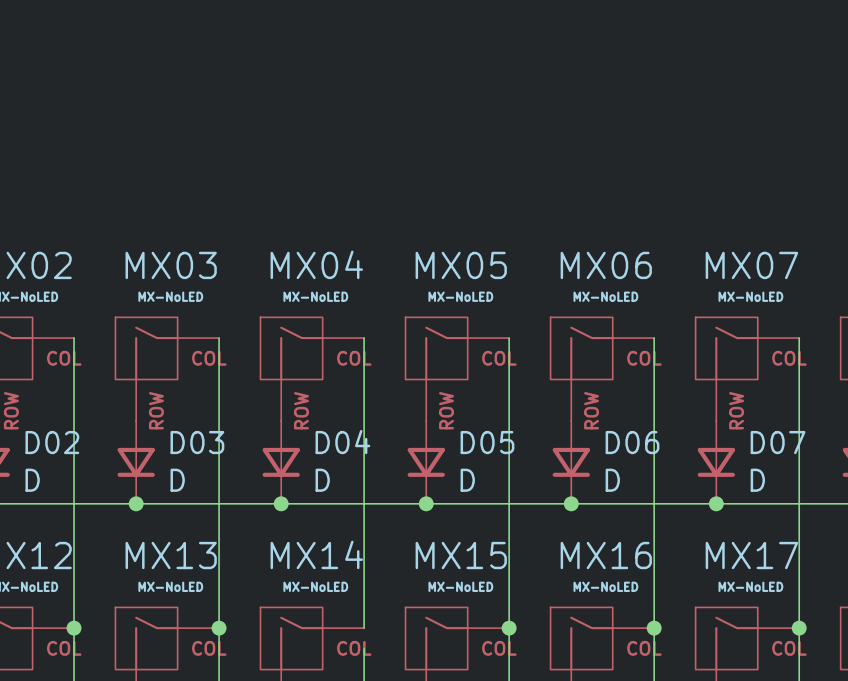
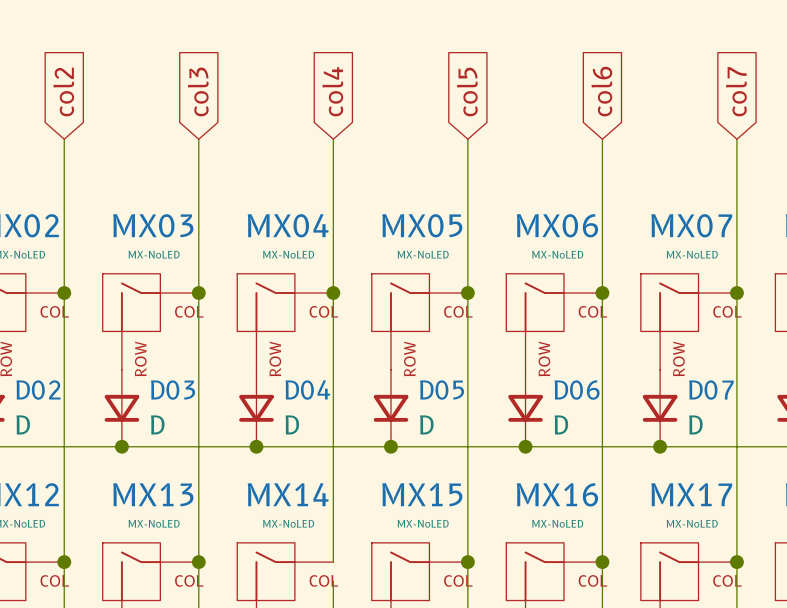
global label: none -> col2 (63, 91)
global label: none -> col3 (198, 91)
global label: none -> col4 (332, 91)
global label: none -> col5 (467, 92)
global label: none -> col6 (601, 91)
global label: none -> col7 (736, 91)
wire: none -> (64, 139) (64, 293)
wire: none -> (198, 139) (198, 293)
wire: none -> (333, 139) (333, 293)
wire: none -> (467, 139) (467, 293)
wire: none -> (602, 139) (602, 293)
wire: none -> (736, 139) (736, 293)
junction: none -> (64, 293)
junction: none -> (198, 293)
junction: none -> (333, 293)
junction: none -> (467, 293)
junction: none -> (602, 293)
junction: none -> (736, 293)

